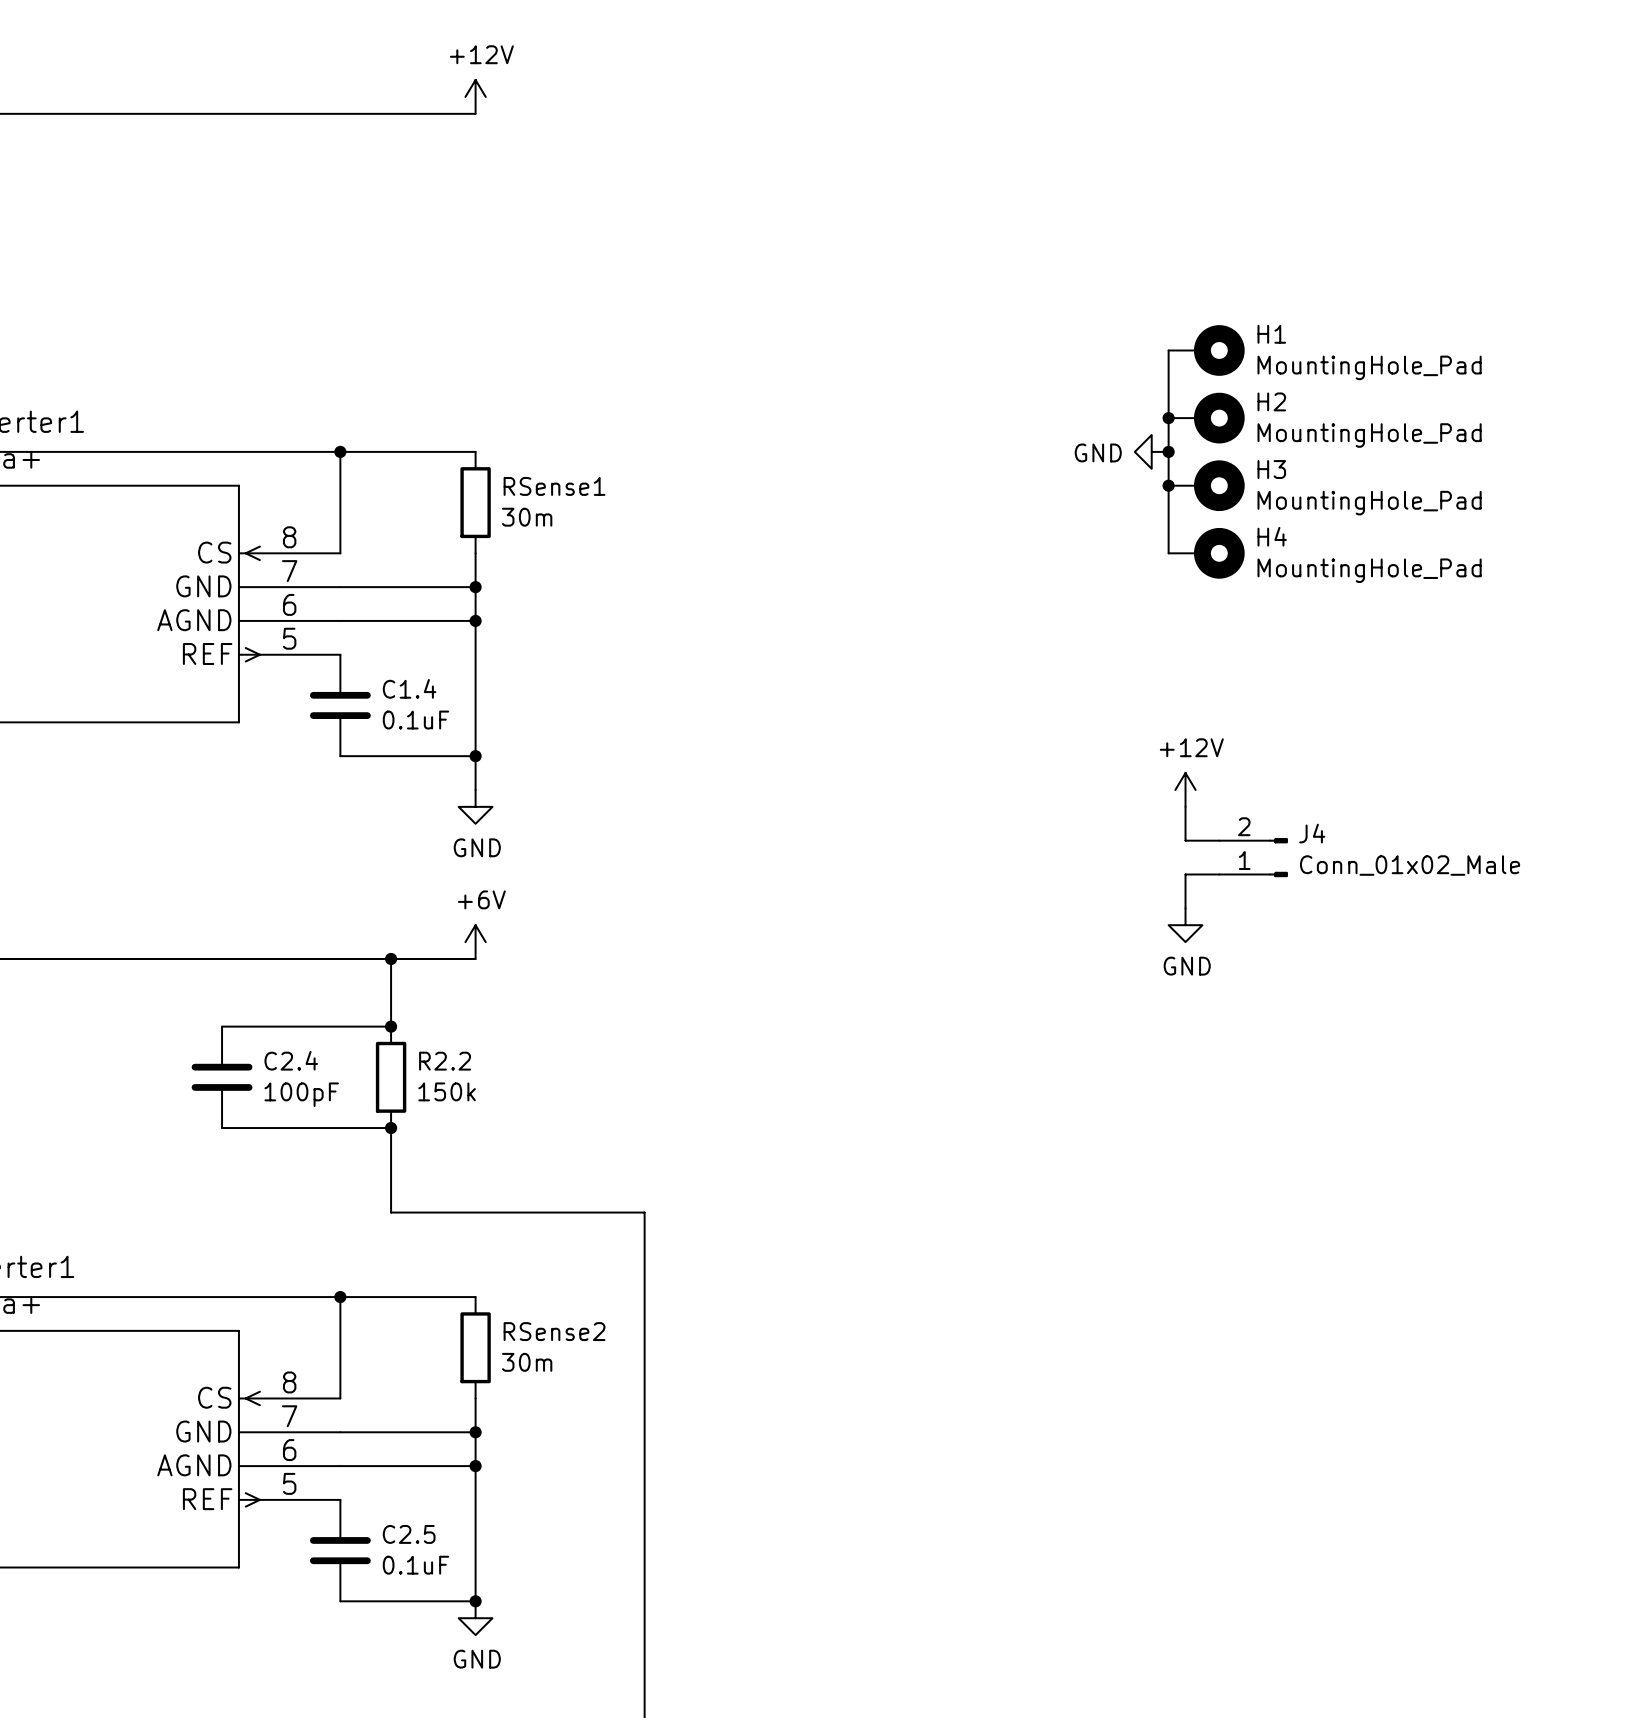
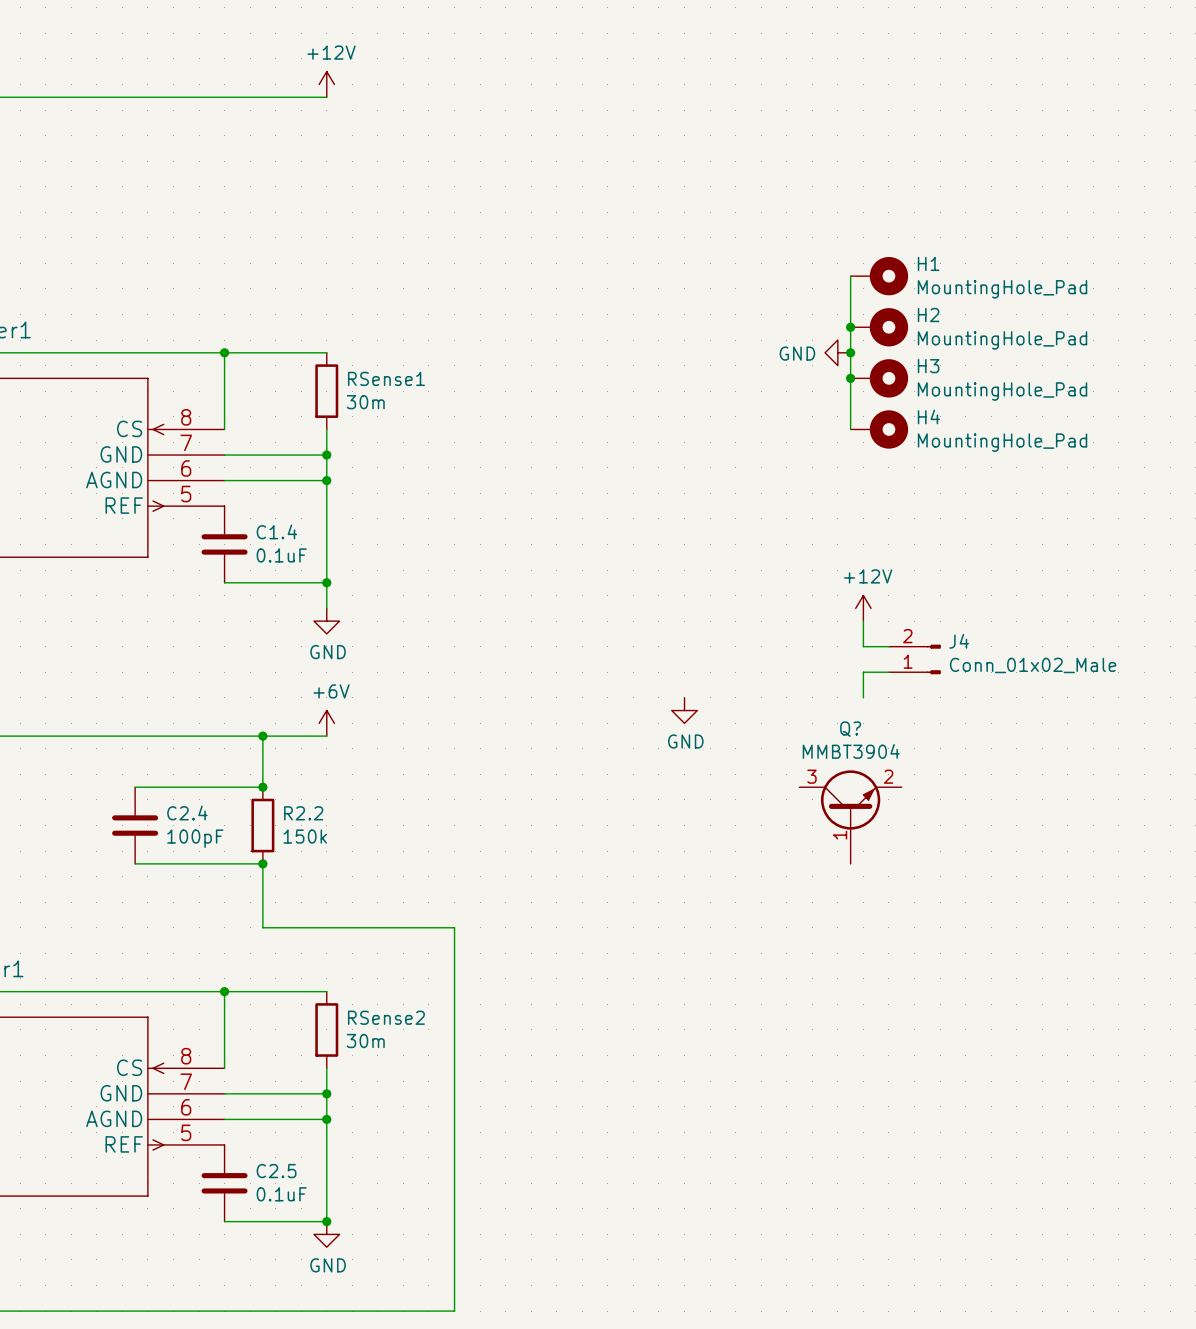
power symbol position: GND (1185, 925) -> GND (684, 710)
Q?: none -> MMBT3904 (850, 817)

